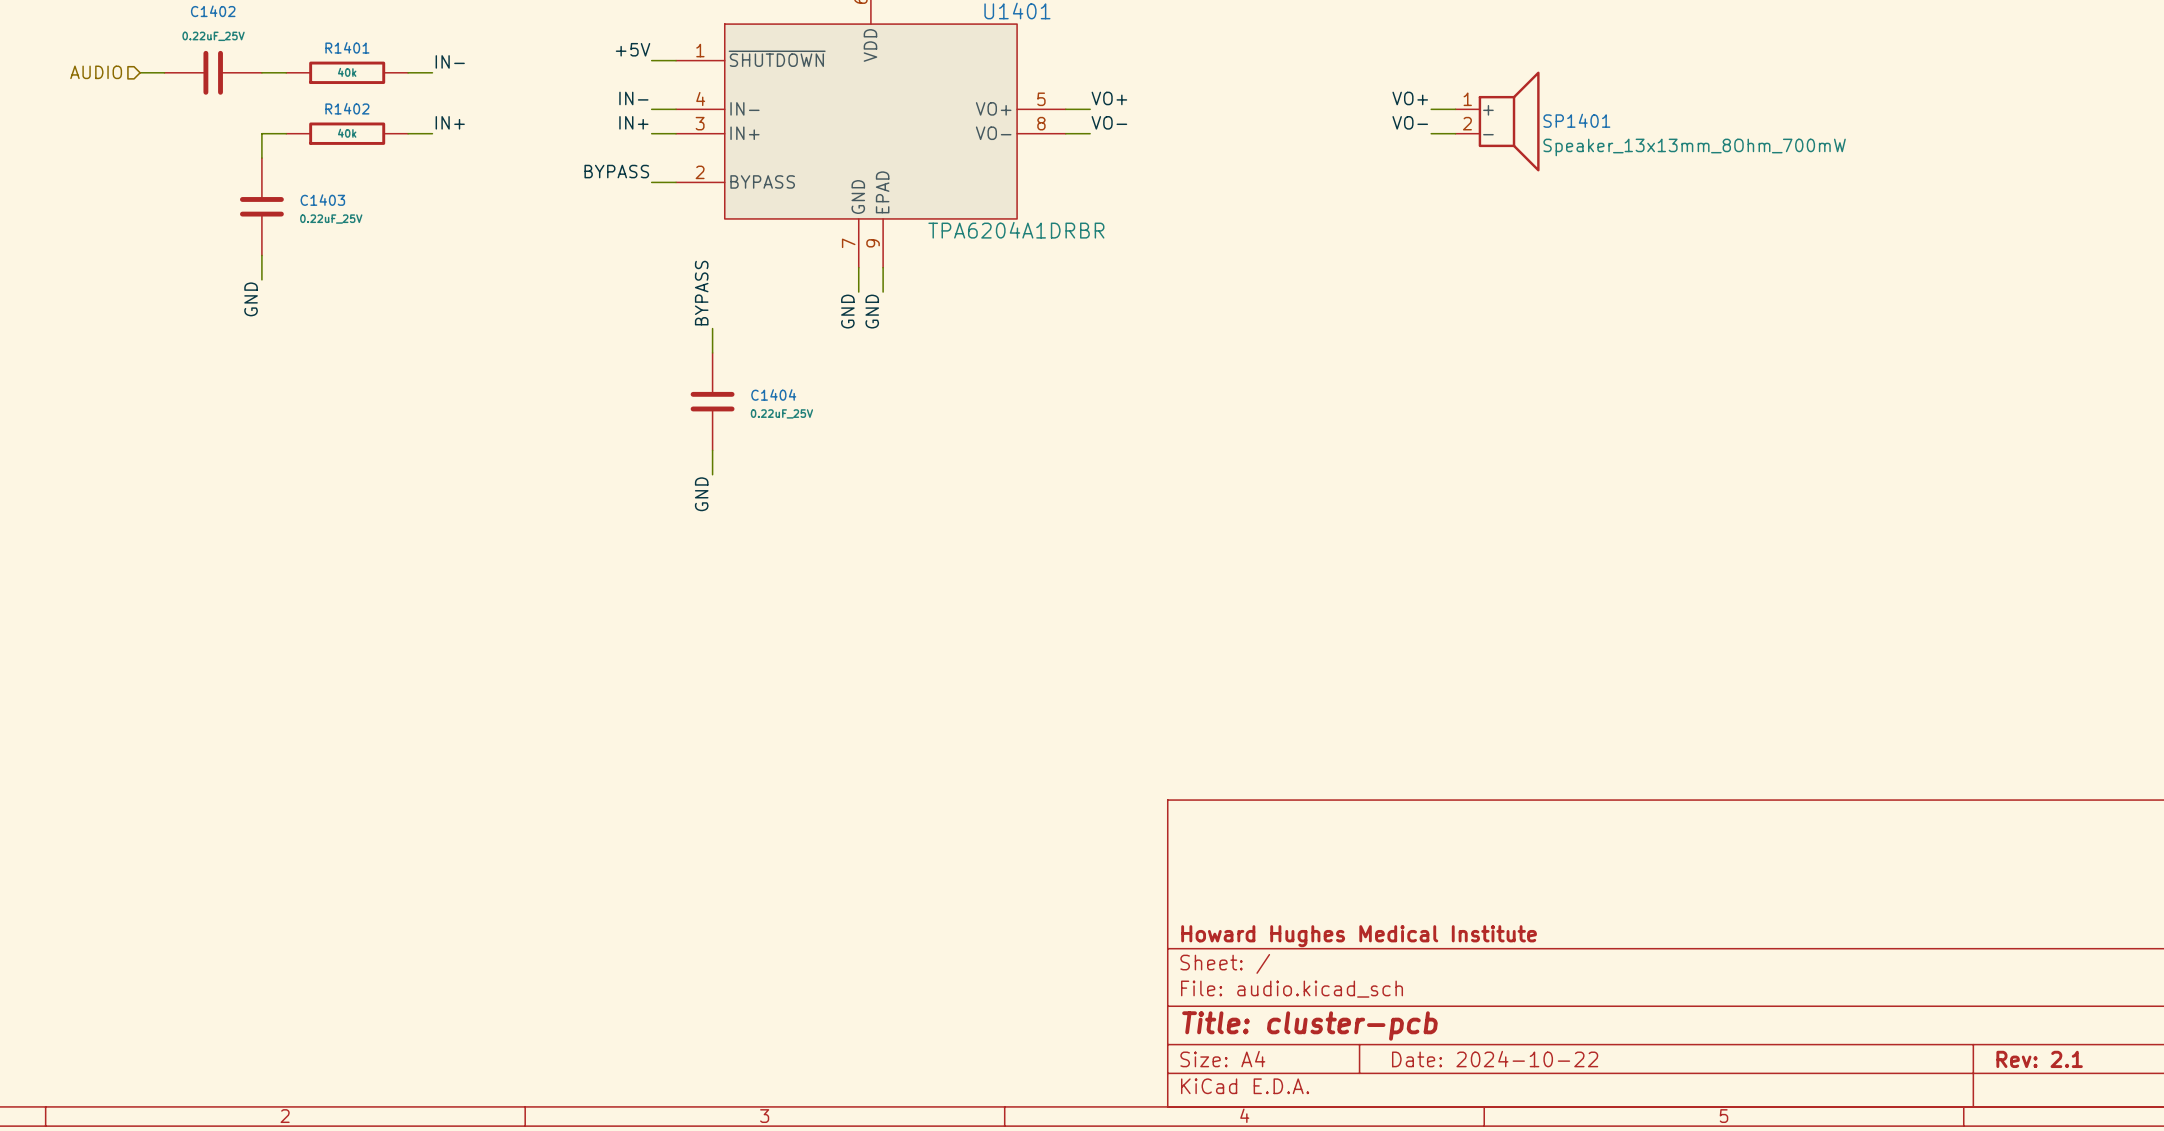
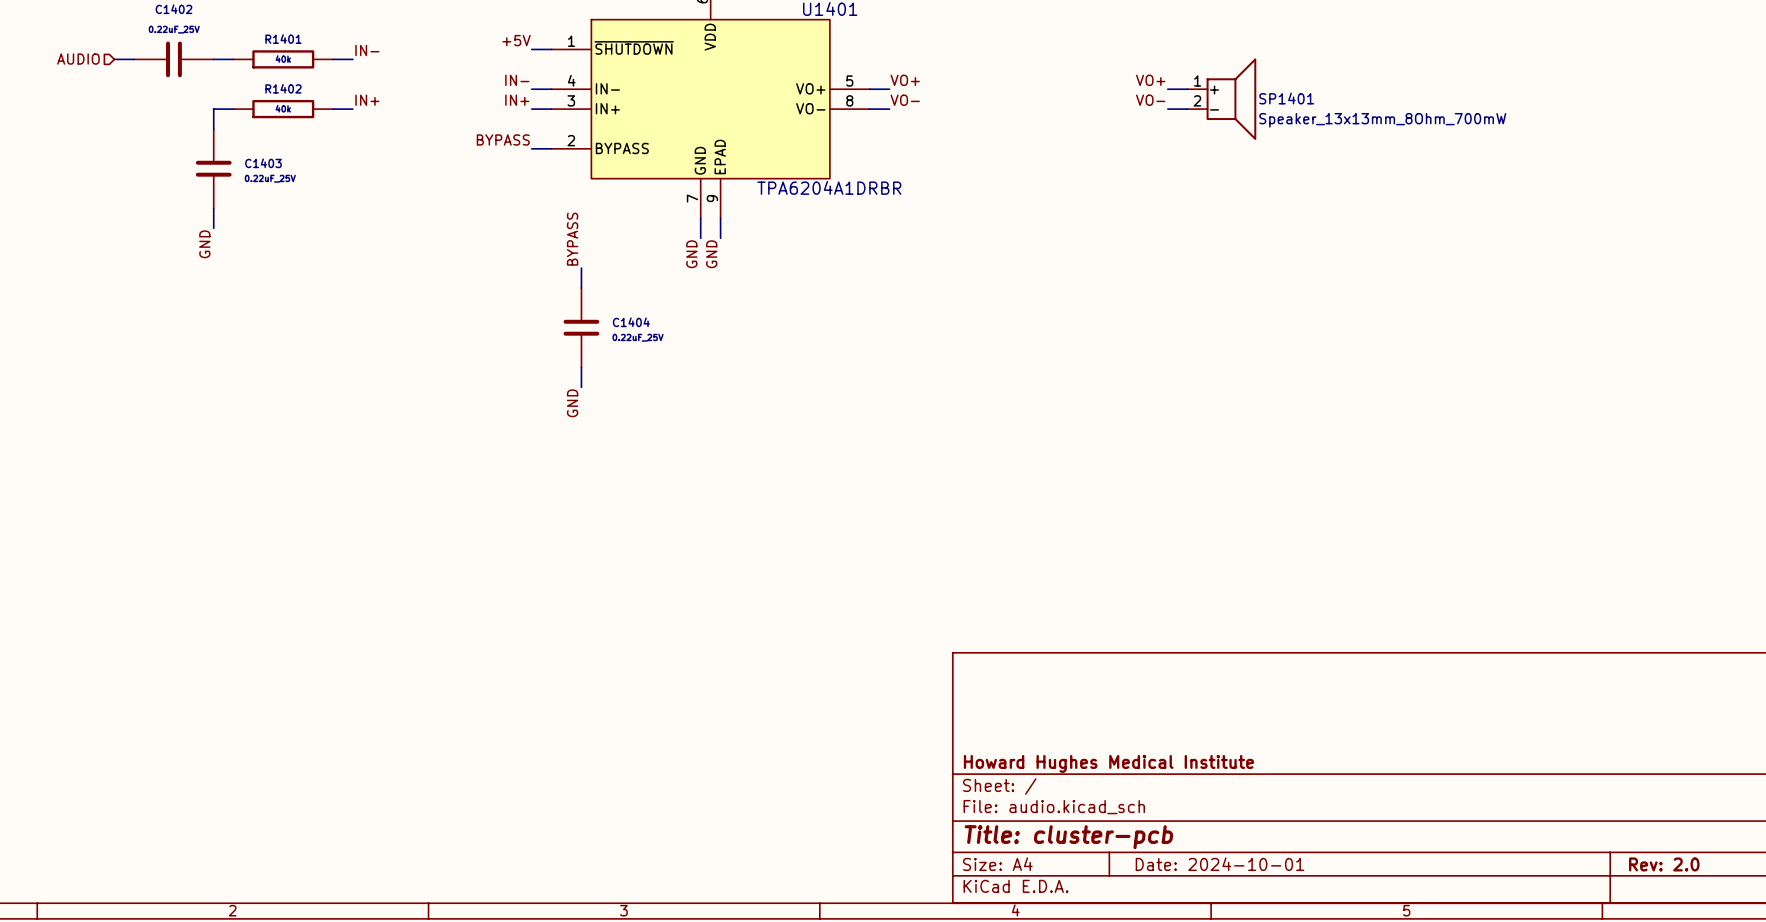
title block: Date: 2024-10-22 (1495, 1059) -> Date: 2024-10-01 (1219, 864)
title block: Rev: 2.1 (2039, 1059) -> Rev: 2.0 (1664, 864)

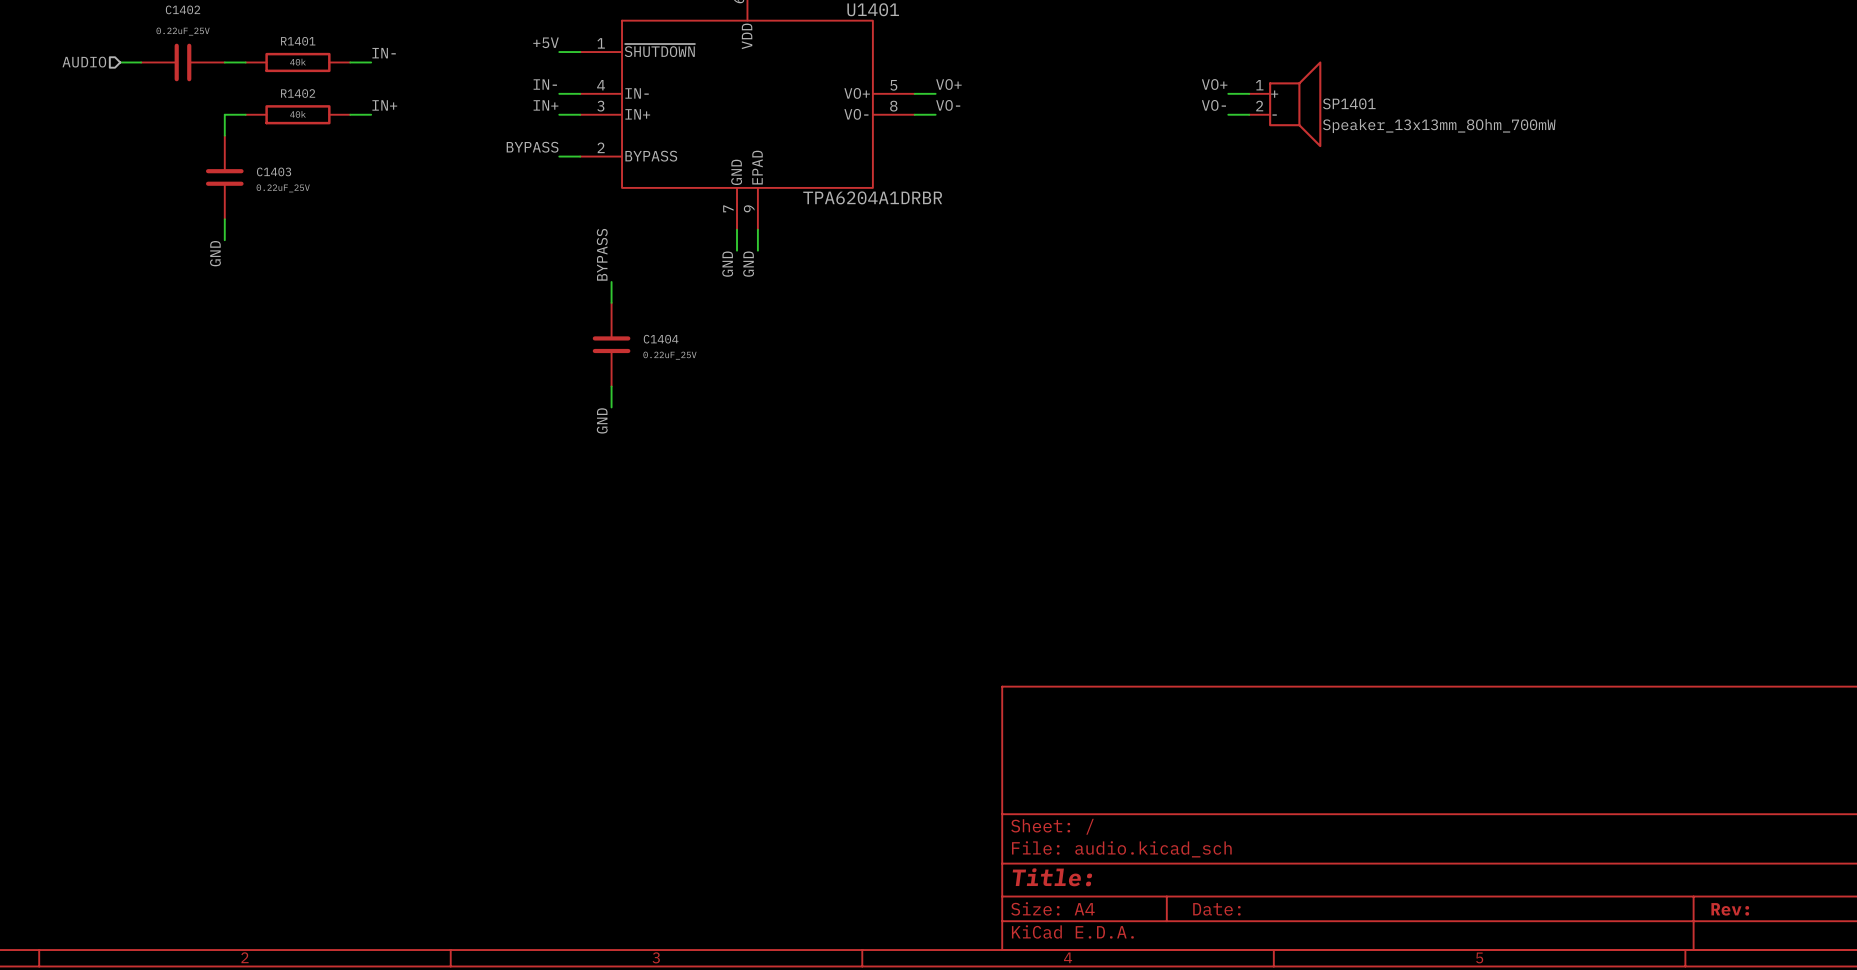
title block: Howard Hughes Medical Institute (1108, 763) -> none
title block: Title: cluster-pcb (1068, 837) -> Title: (1052, 877)
title block: Date: 2024-10-01 (1219, 864) -> Date: (1216, 909)
title block: Rev: 2.0 (1664, 864) -> Rev: (1730, 909)

